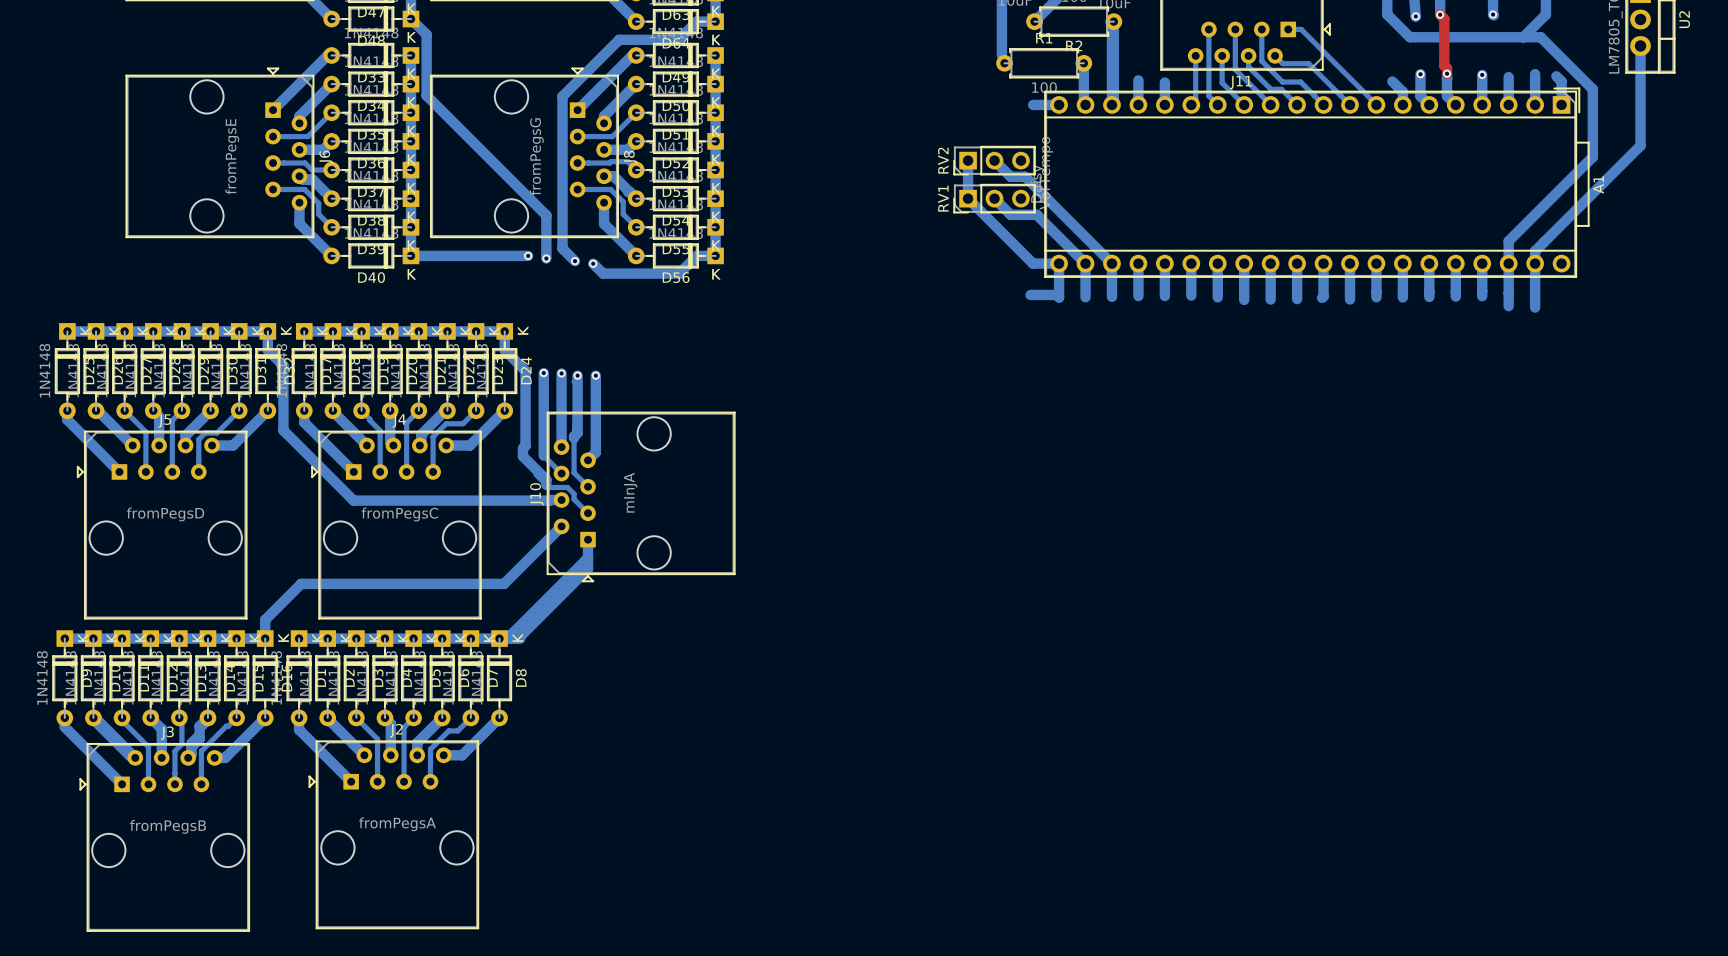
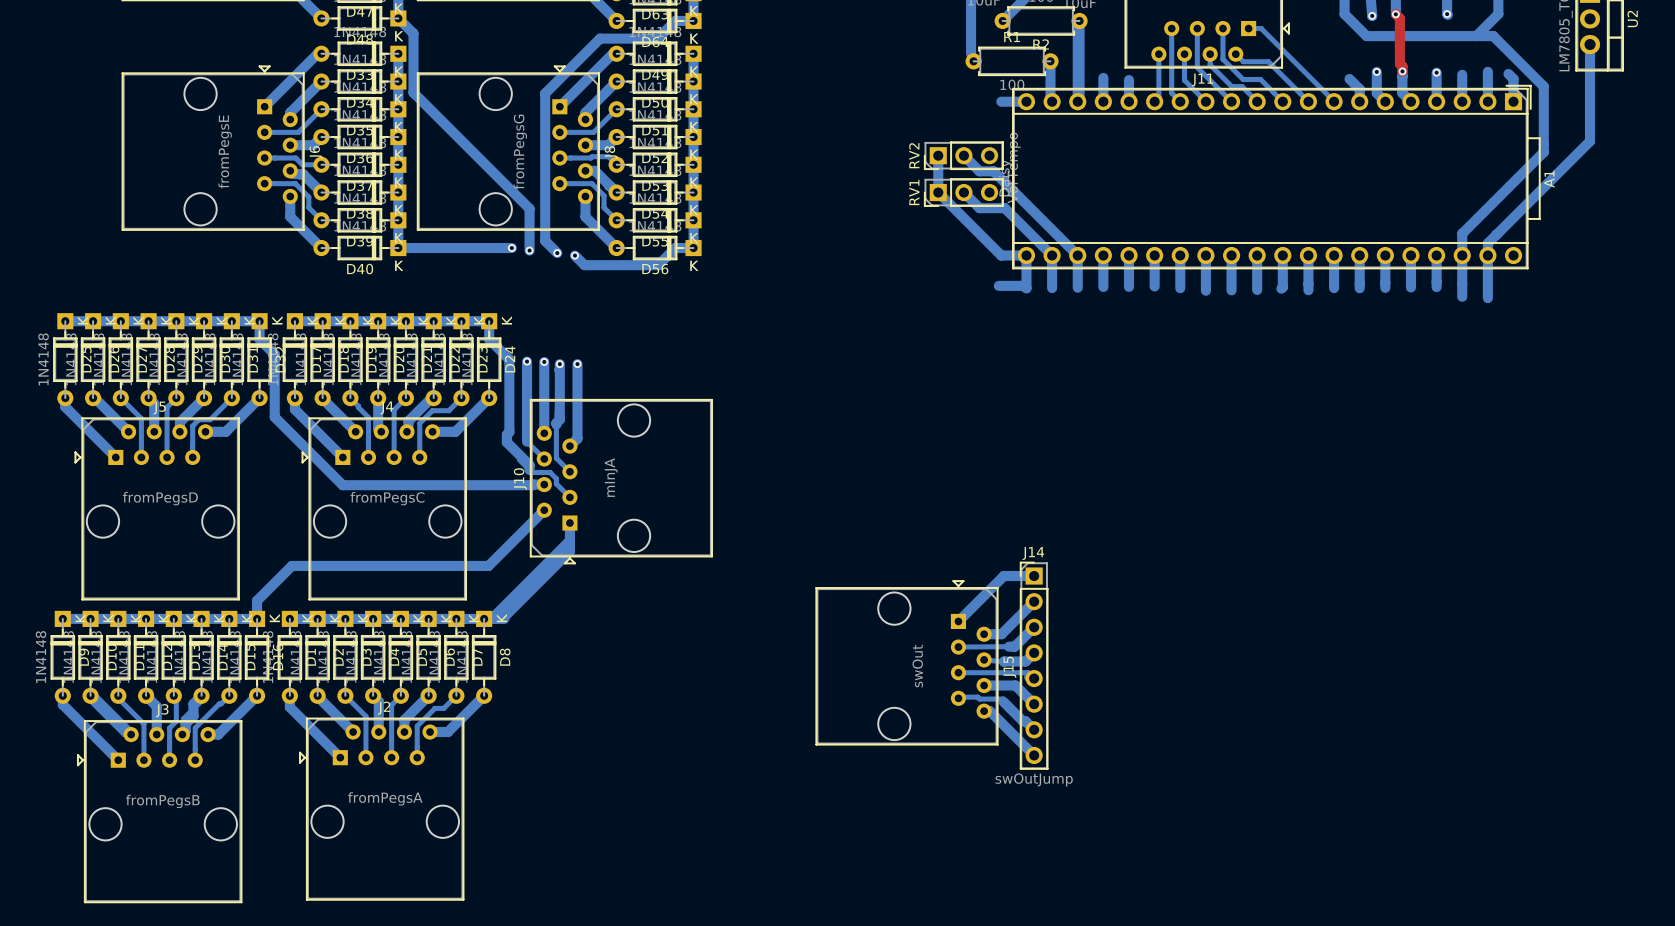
bottom track: none -> (1034, 576) (1003, 576) (958, 621)
bottom track: none -> (1034, 601) (1001, 634) (984, 634)
bottom track: none -> (1034, 627) (1014, 646) (958, 647)
bottom track: none -> (1034, 652) (1025, 661) (984, 659)
J15: none -> swOut (906, 662)
J14: none -> swOutJump (1034, 665)
bottom track: none -> (958, 672) (1028, 672) (1030, 678) (1034, 678)
bottom track: none -> (984, 685) (1015, 685) (1034, 704)
bottom track: none -> (958, 698) (977, 697) (979, 699) (1003, 699) (1003, 702) (1034, 729)
bottom track: none -> (984, 711) (989, 711) (1034, 755)

